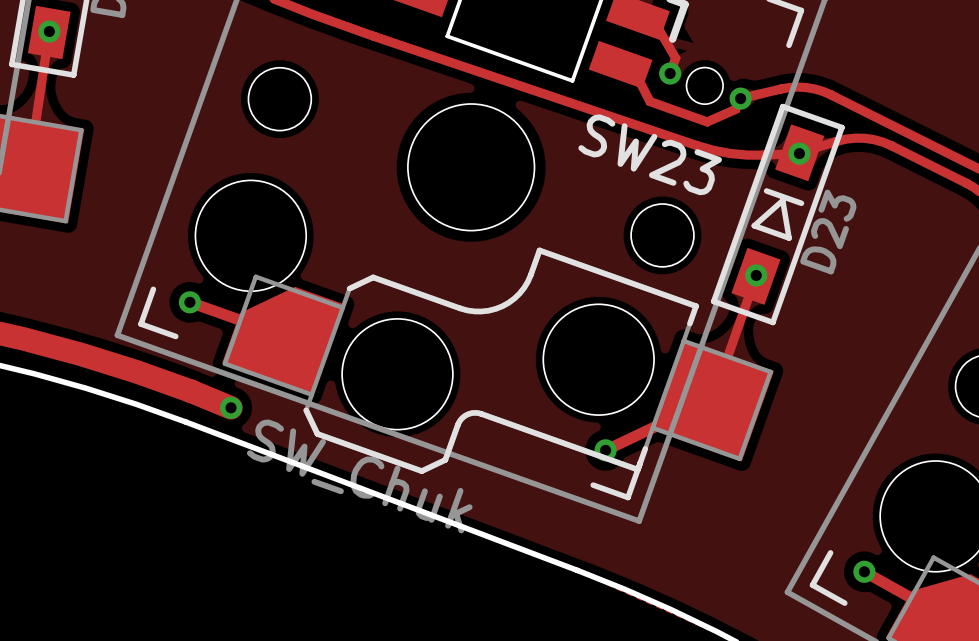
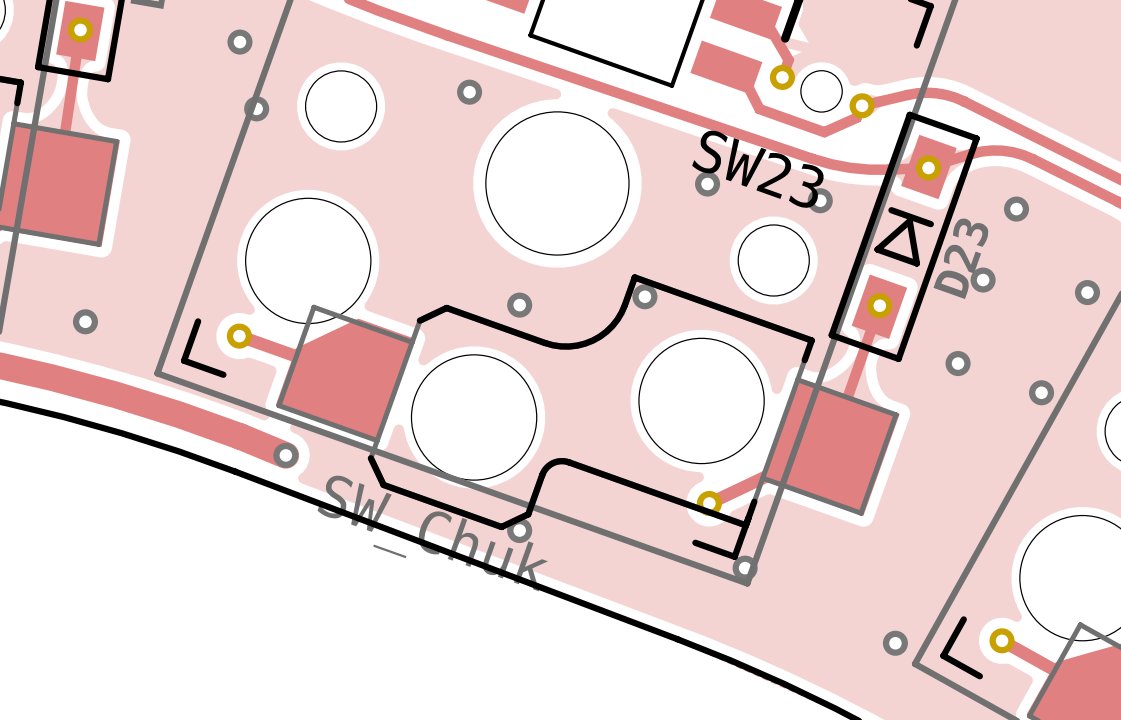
via: none -> (239, 42)
via: none -> (469, 92)
via: none -> (256, 108)
via: none -> (707, 184)
via: none -> (820, 200)
via: none -> (1016, 209)
via: none -> (983, 280)
via: none -> (1087, 292)
via: none -> (644, 296)
via: none -> (519, 305)
via: none -> (85, 321)
via: none -> (958, 363)
via: none -> (1041, 392)
via: none -> (519, 530)
via: none -> (745, 568)
via: none -> (895, 643)

